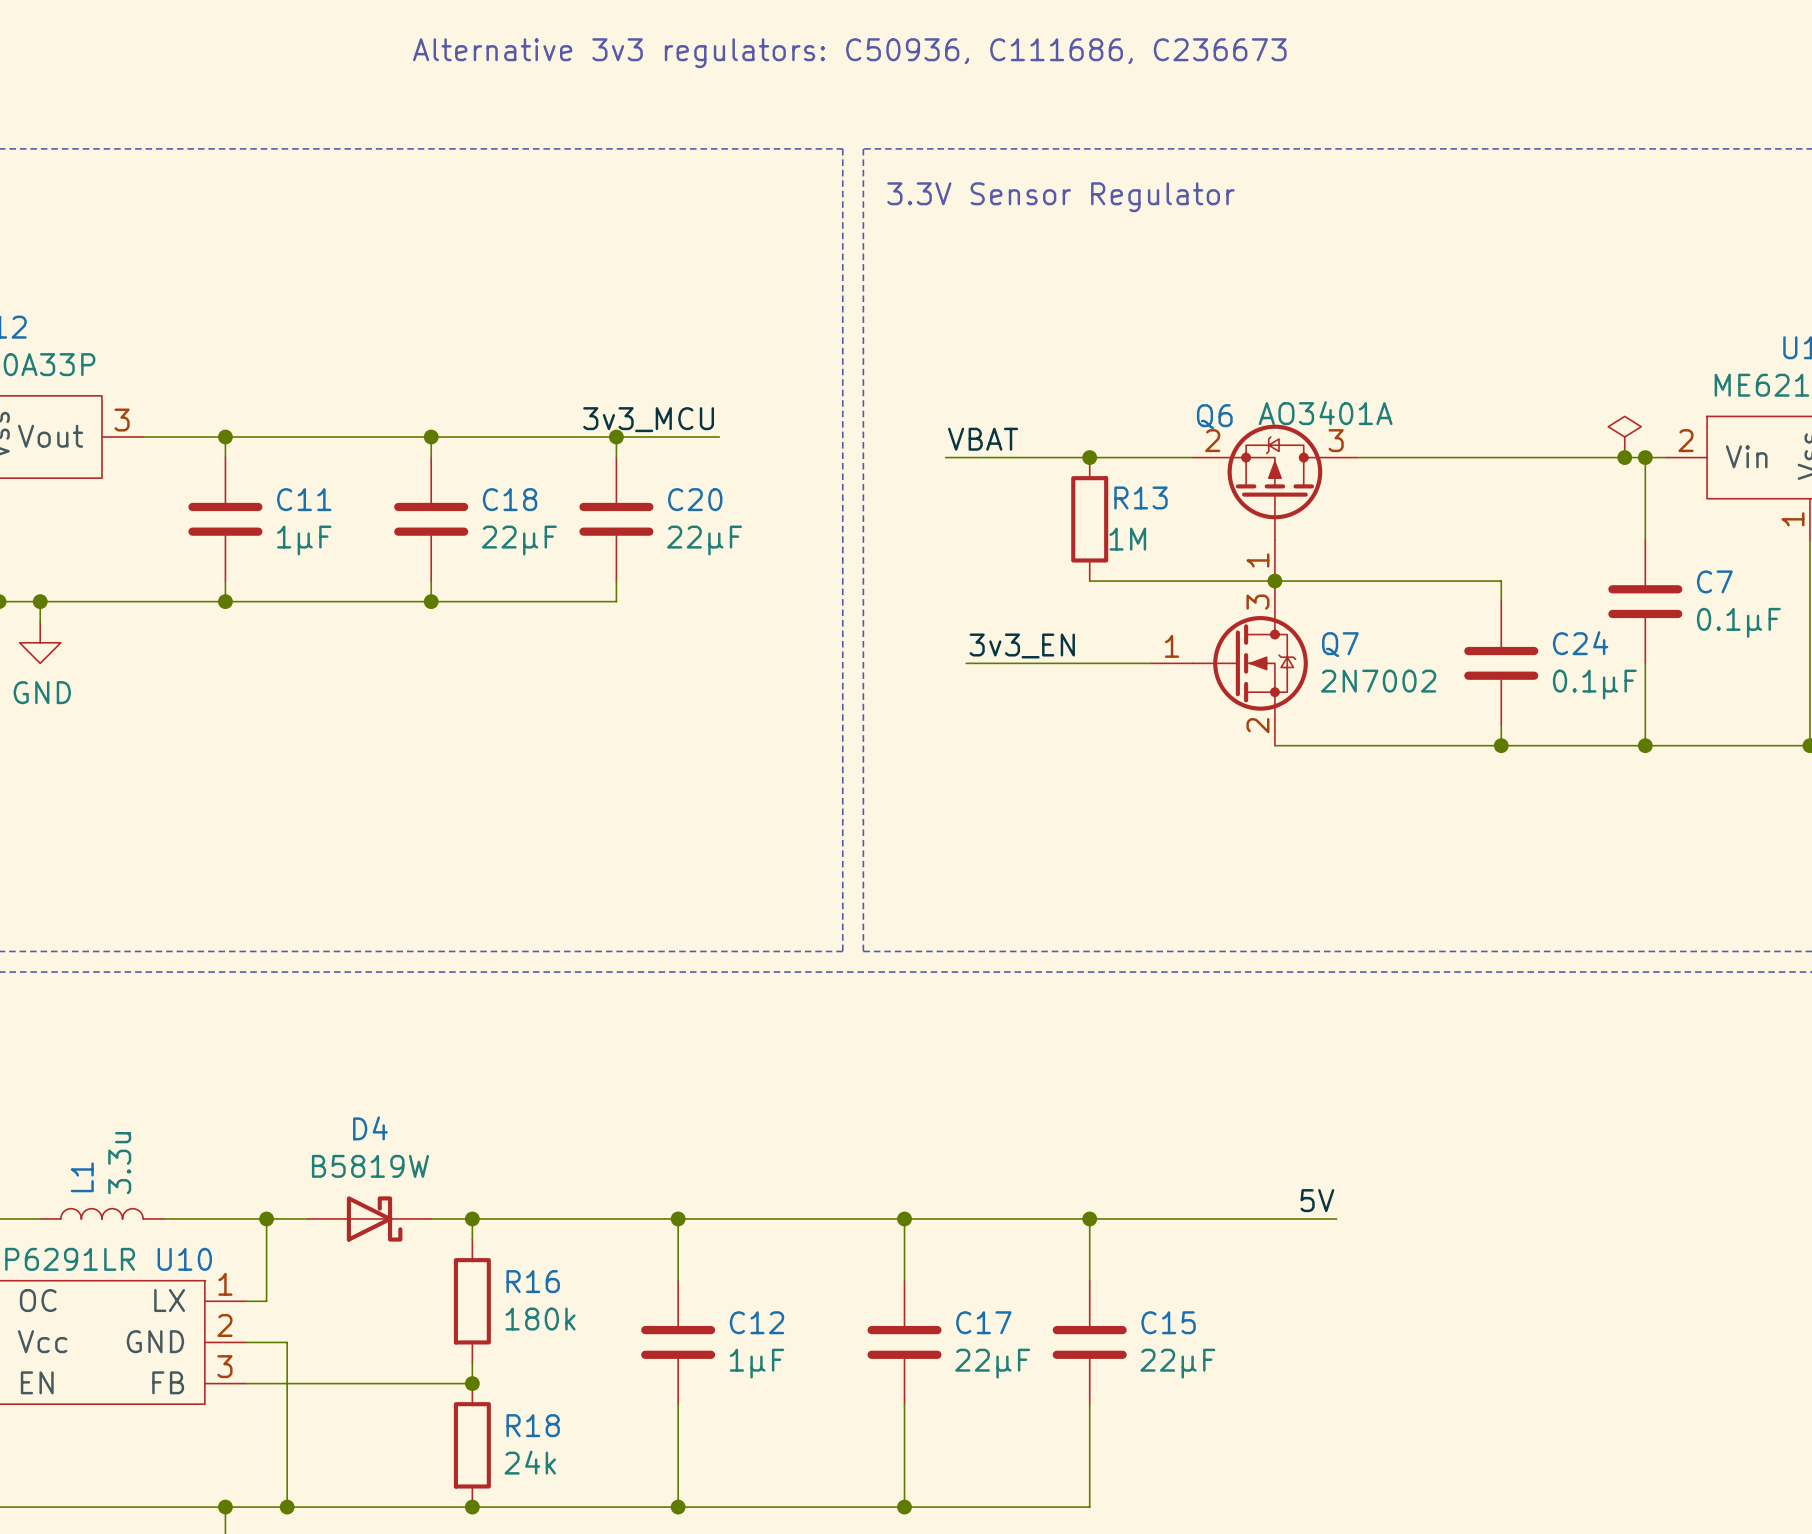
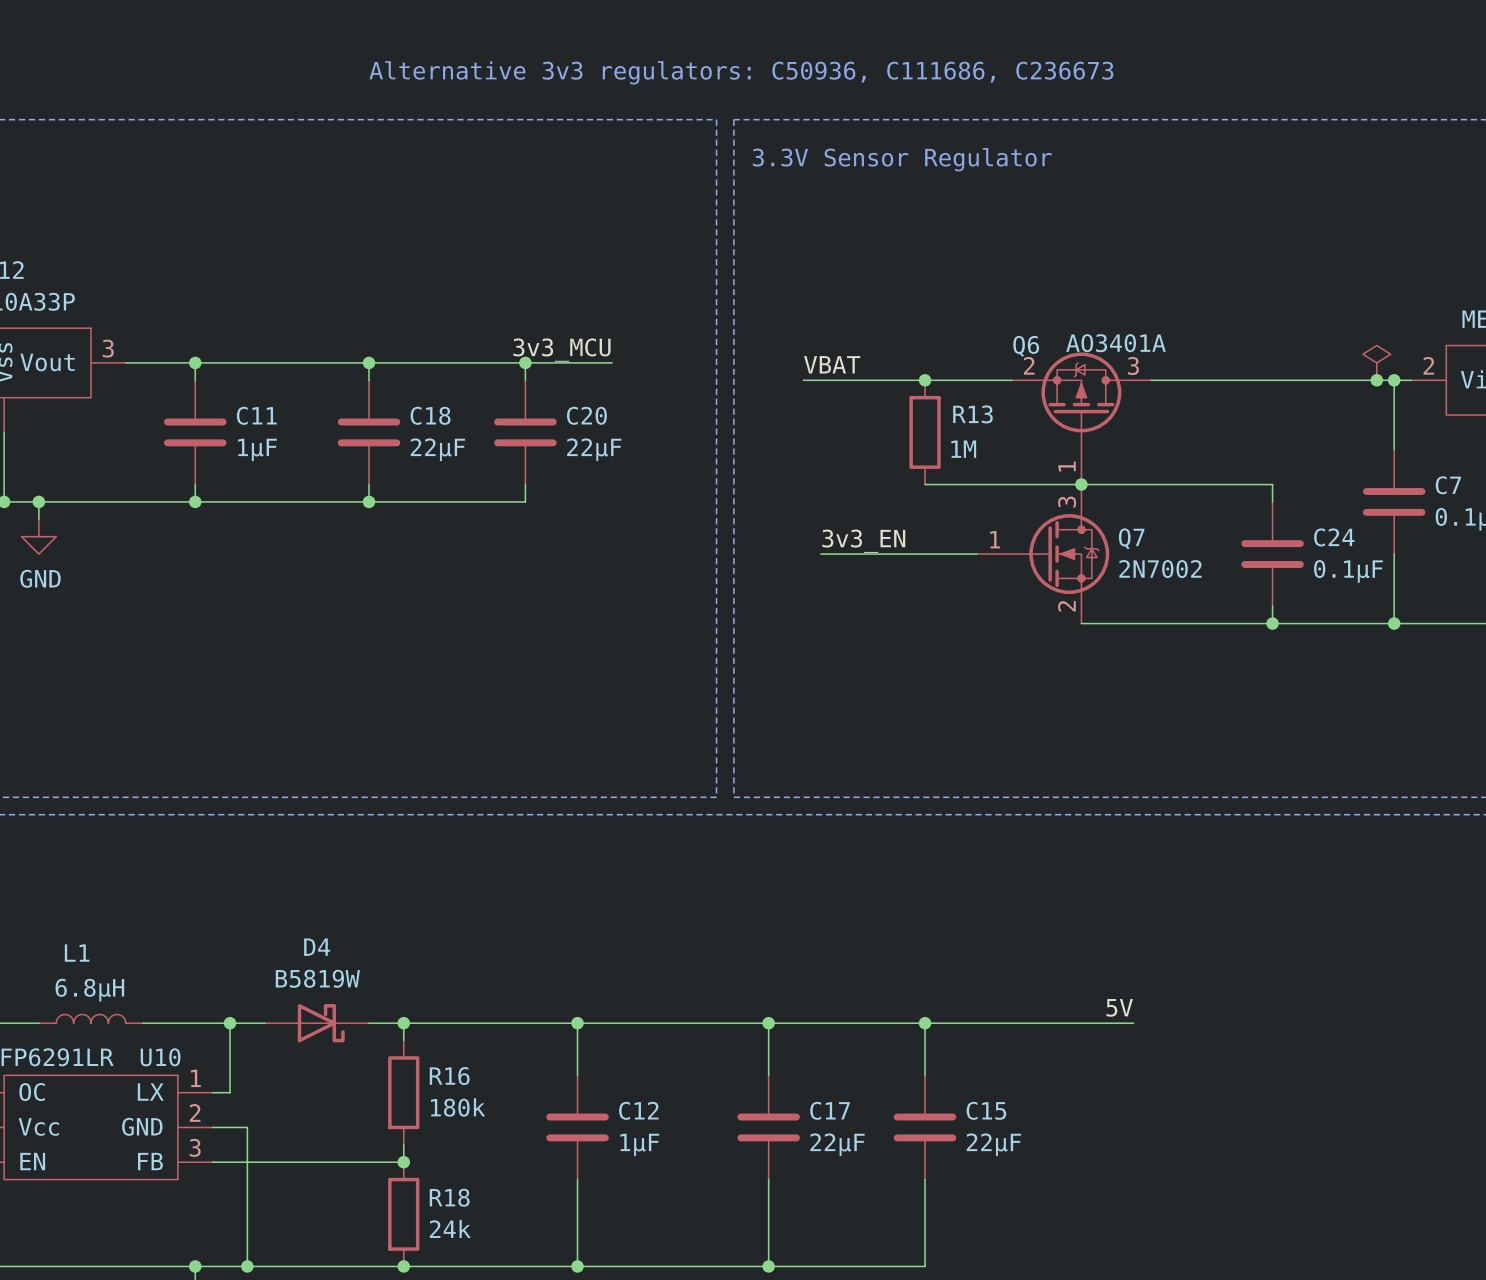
text position: Alternative 3v3 regulators: C50936, C111686, C236673 (849, 53) -> Alternative 3v3 regulators: C50936, C111686, C236673 (741, 72)
L1 value: 3.3u (119, 1163) -> 6.8µH (89, 990)
L1 name rotation: 0° (82, 1177) -> 90° clockwise (77, 953)

